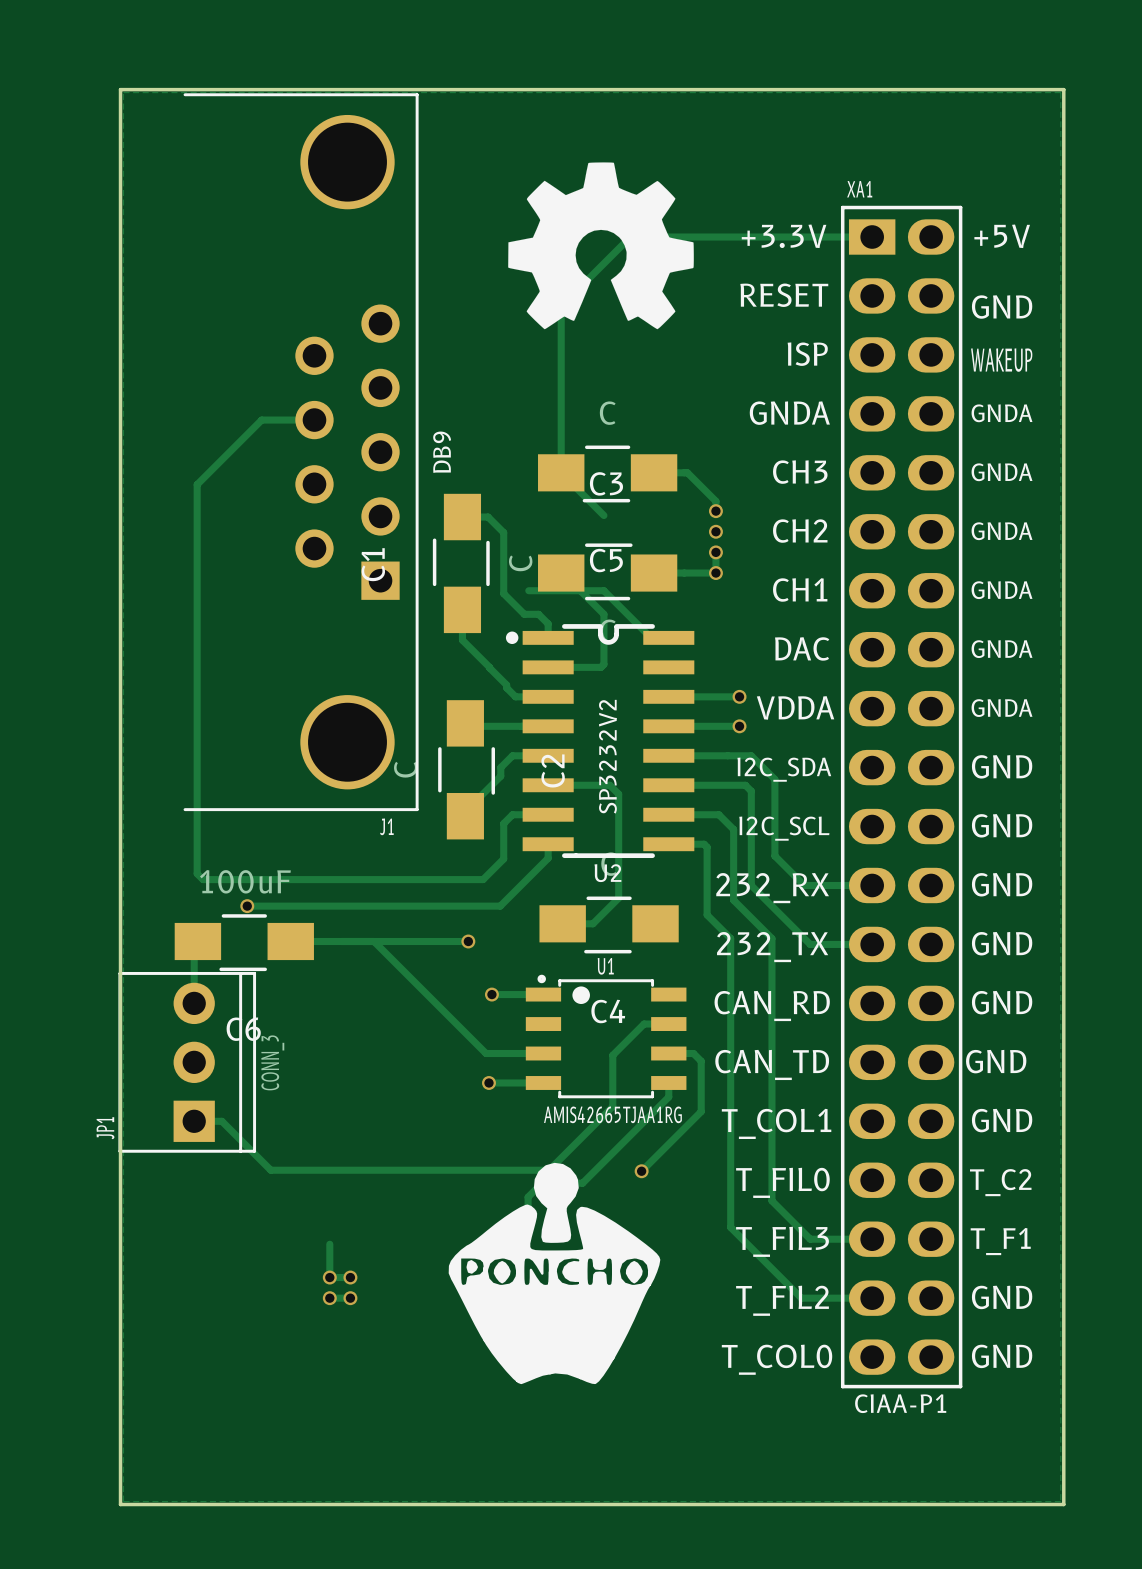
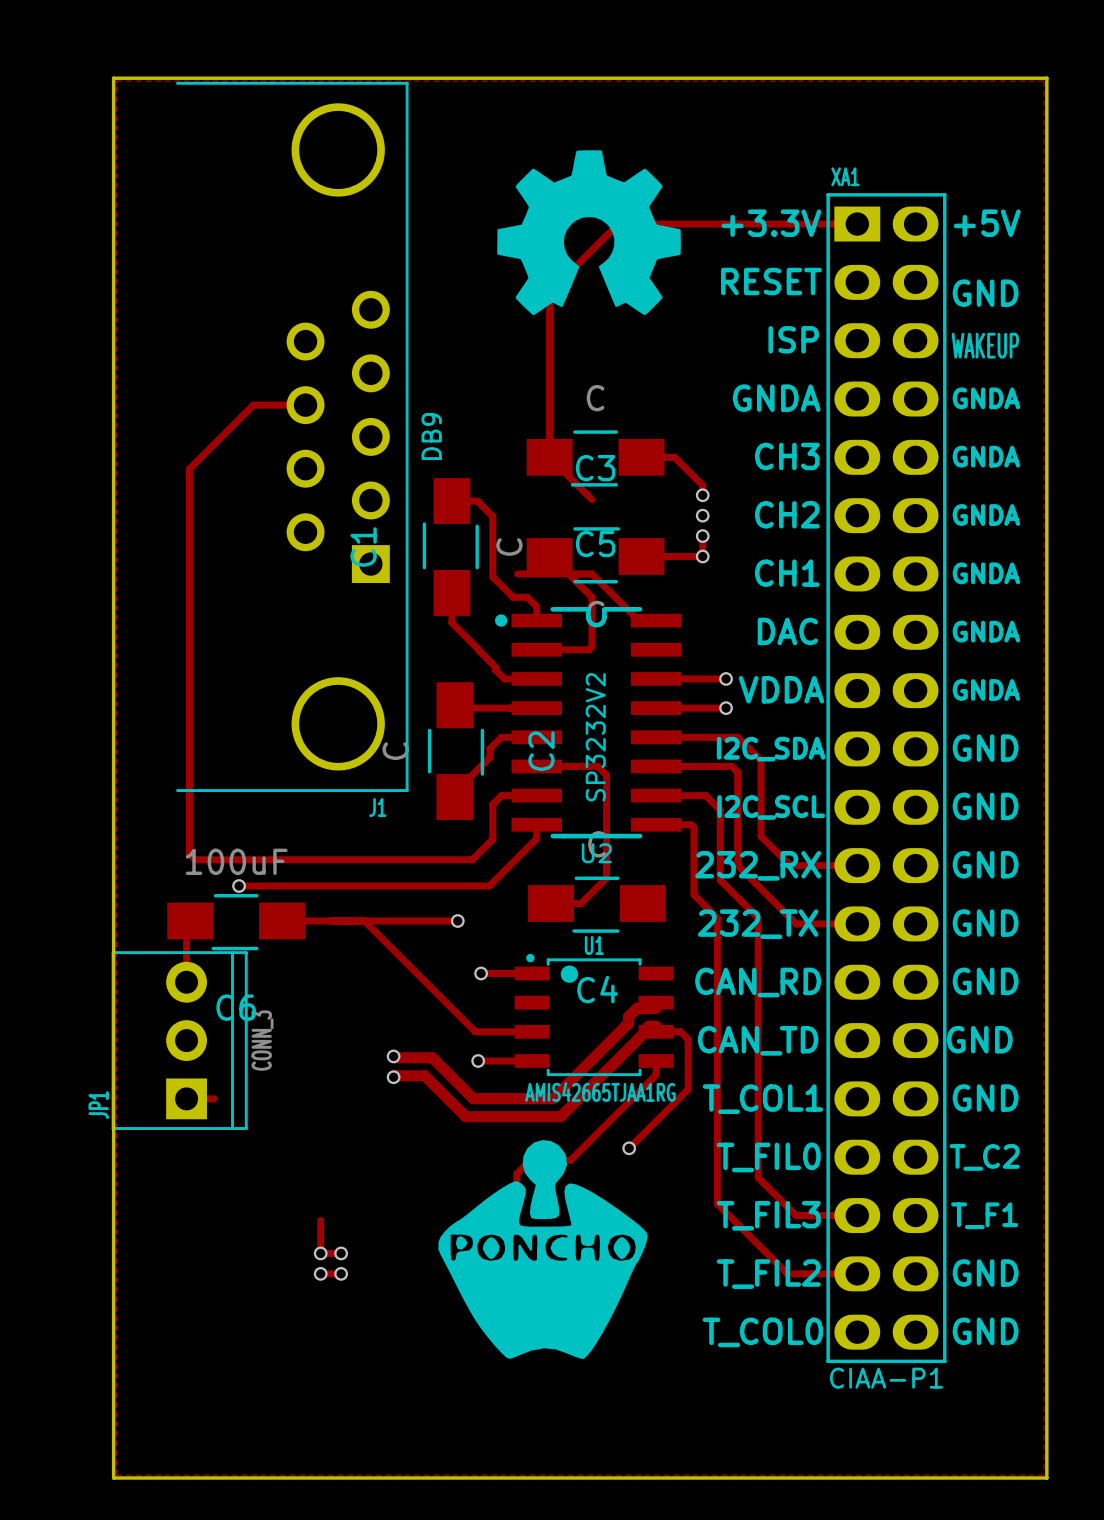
track: (668, 1024) (644, 1024) (612, 1055) (612, 1106) (549, 1170) (270, 1170) (221, 1121) -> none
track: none -> (650, 1008) (656, 1002) (656, 1008) (637, 1008) (628, 1016) (628, 1023) (553, 1098) (473, 1098) (432, 1057) (393, 1056)
track: none -> (648, 1026) (650, 1026) (656, 1031) (656, 1026) (651, 1026) (560, 1116) (465, 1116) (424, 1075) (393, 1077)
via: none -> (393, 1056)
via: none -> (393, 1077)

